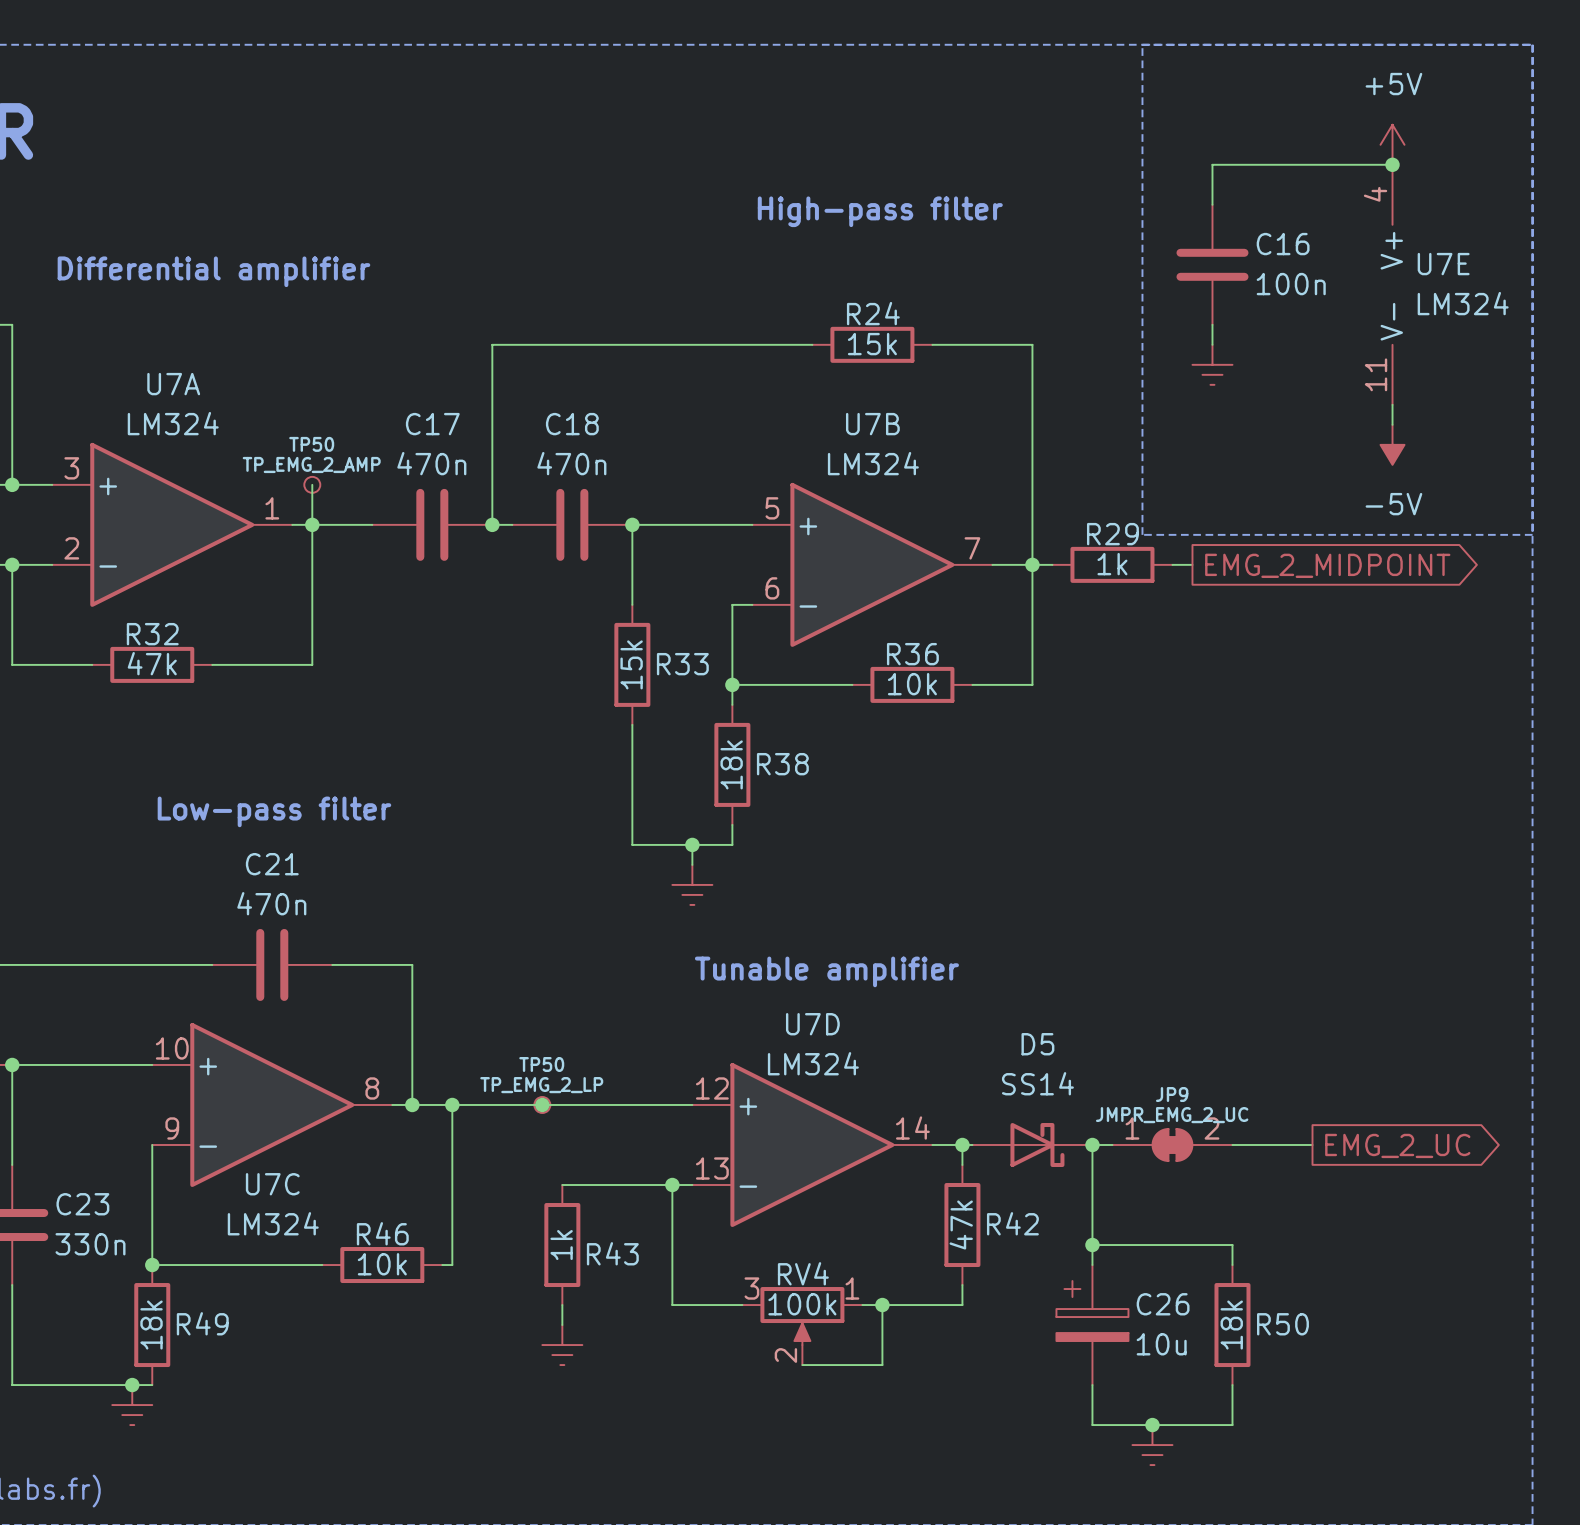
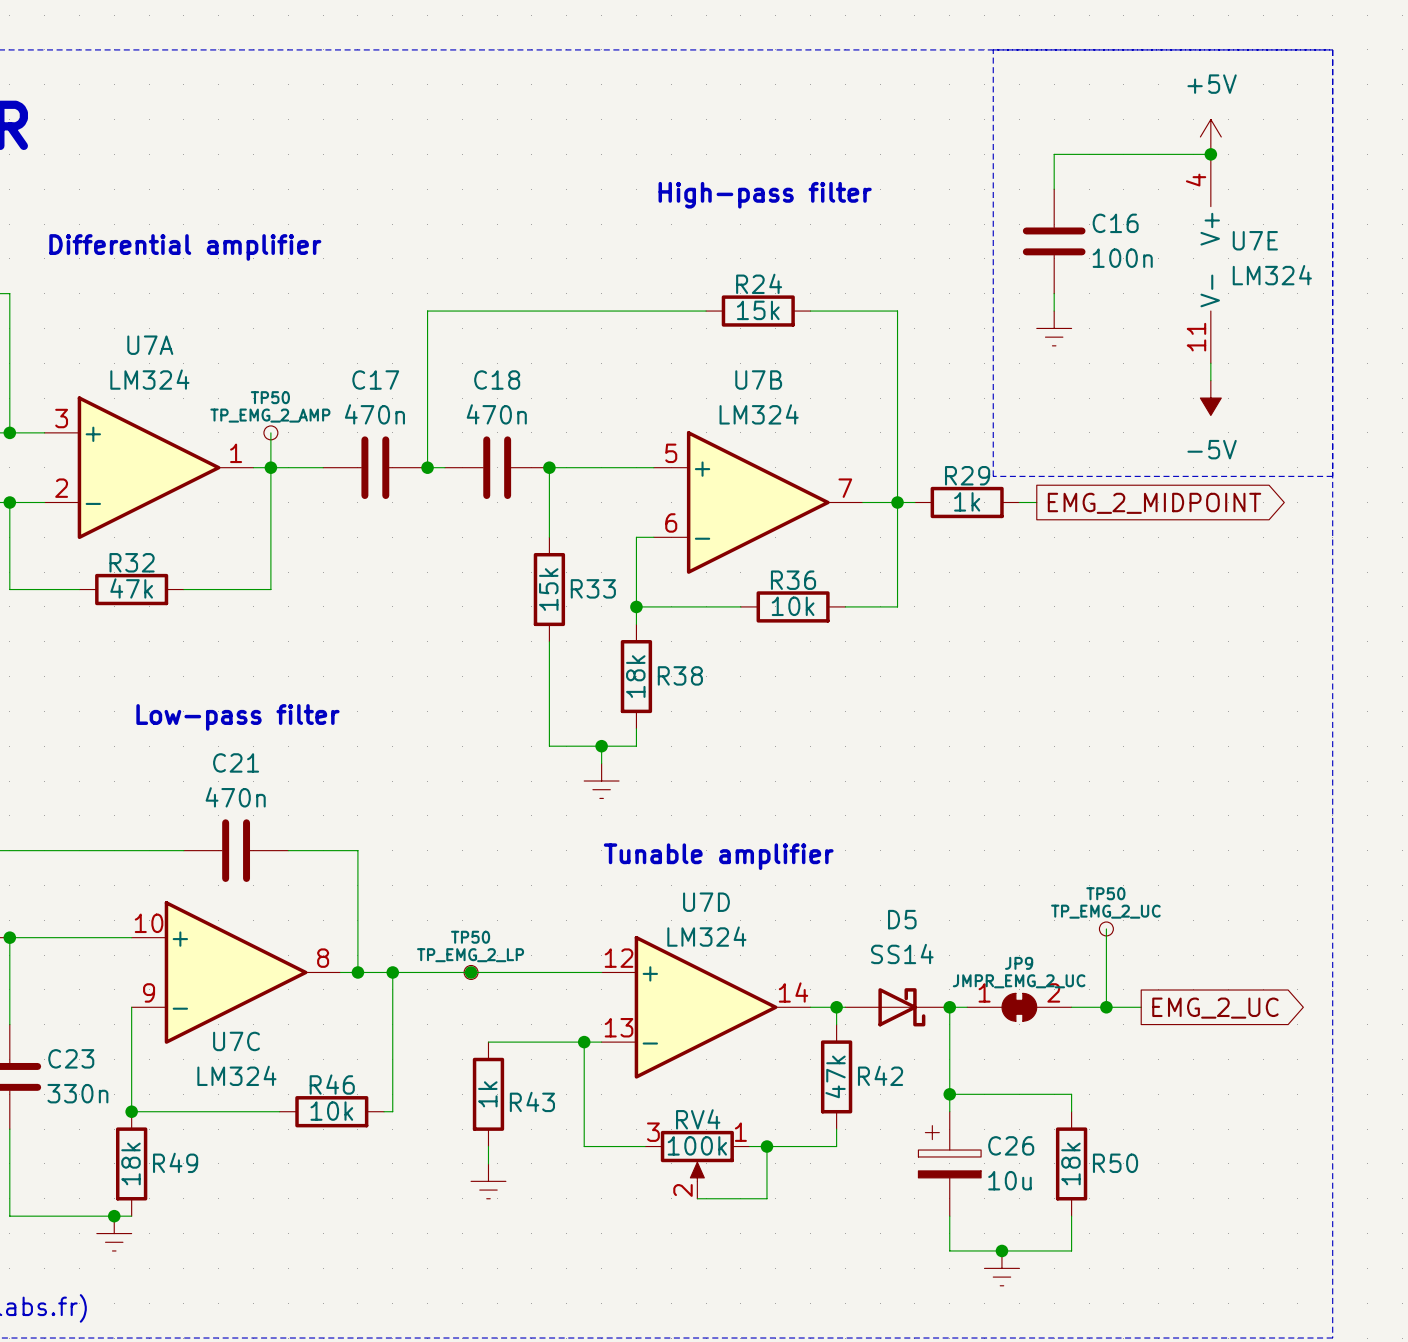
wire: none -> (1106, 928) (1106, 1007)
TP50: none -> TP_EMG_2_UC (1106, 928)
junction: none -> (1106, 1007)

